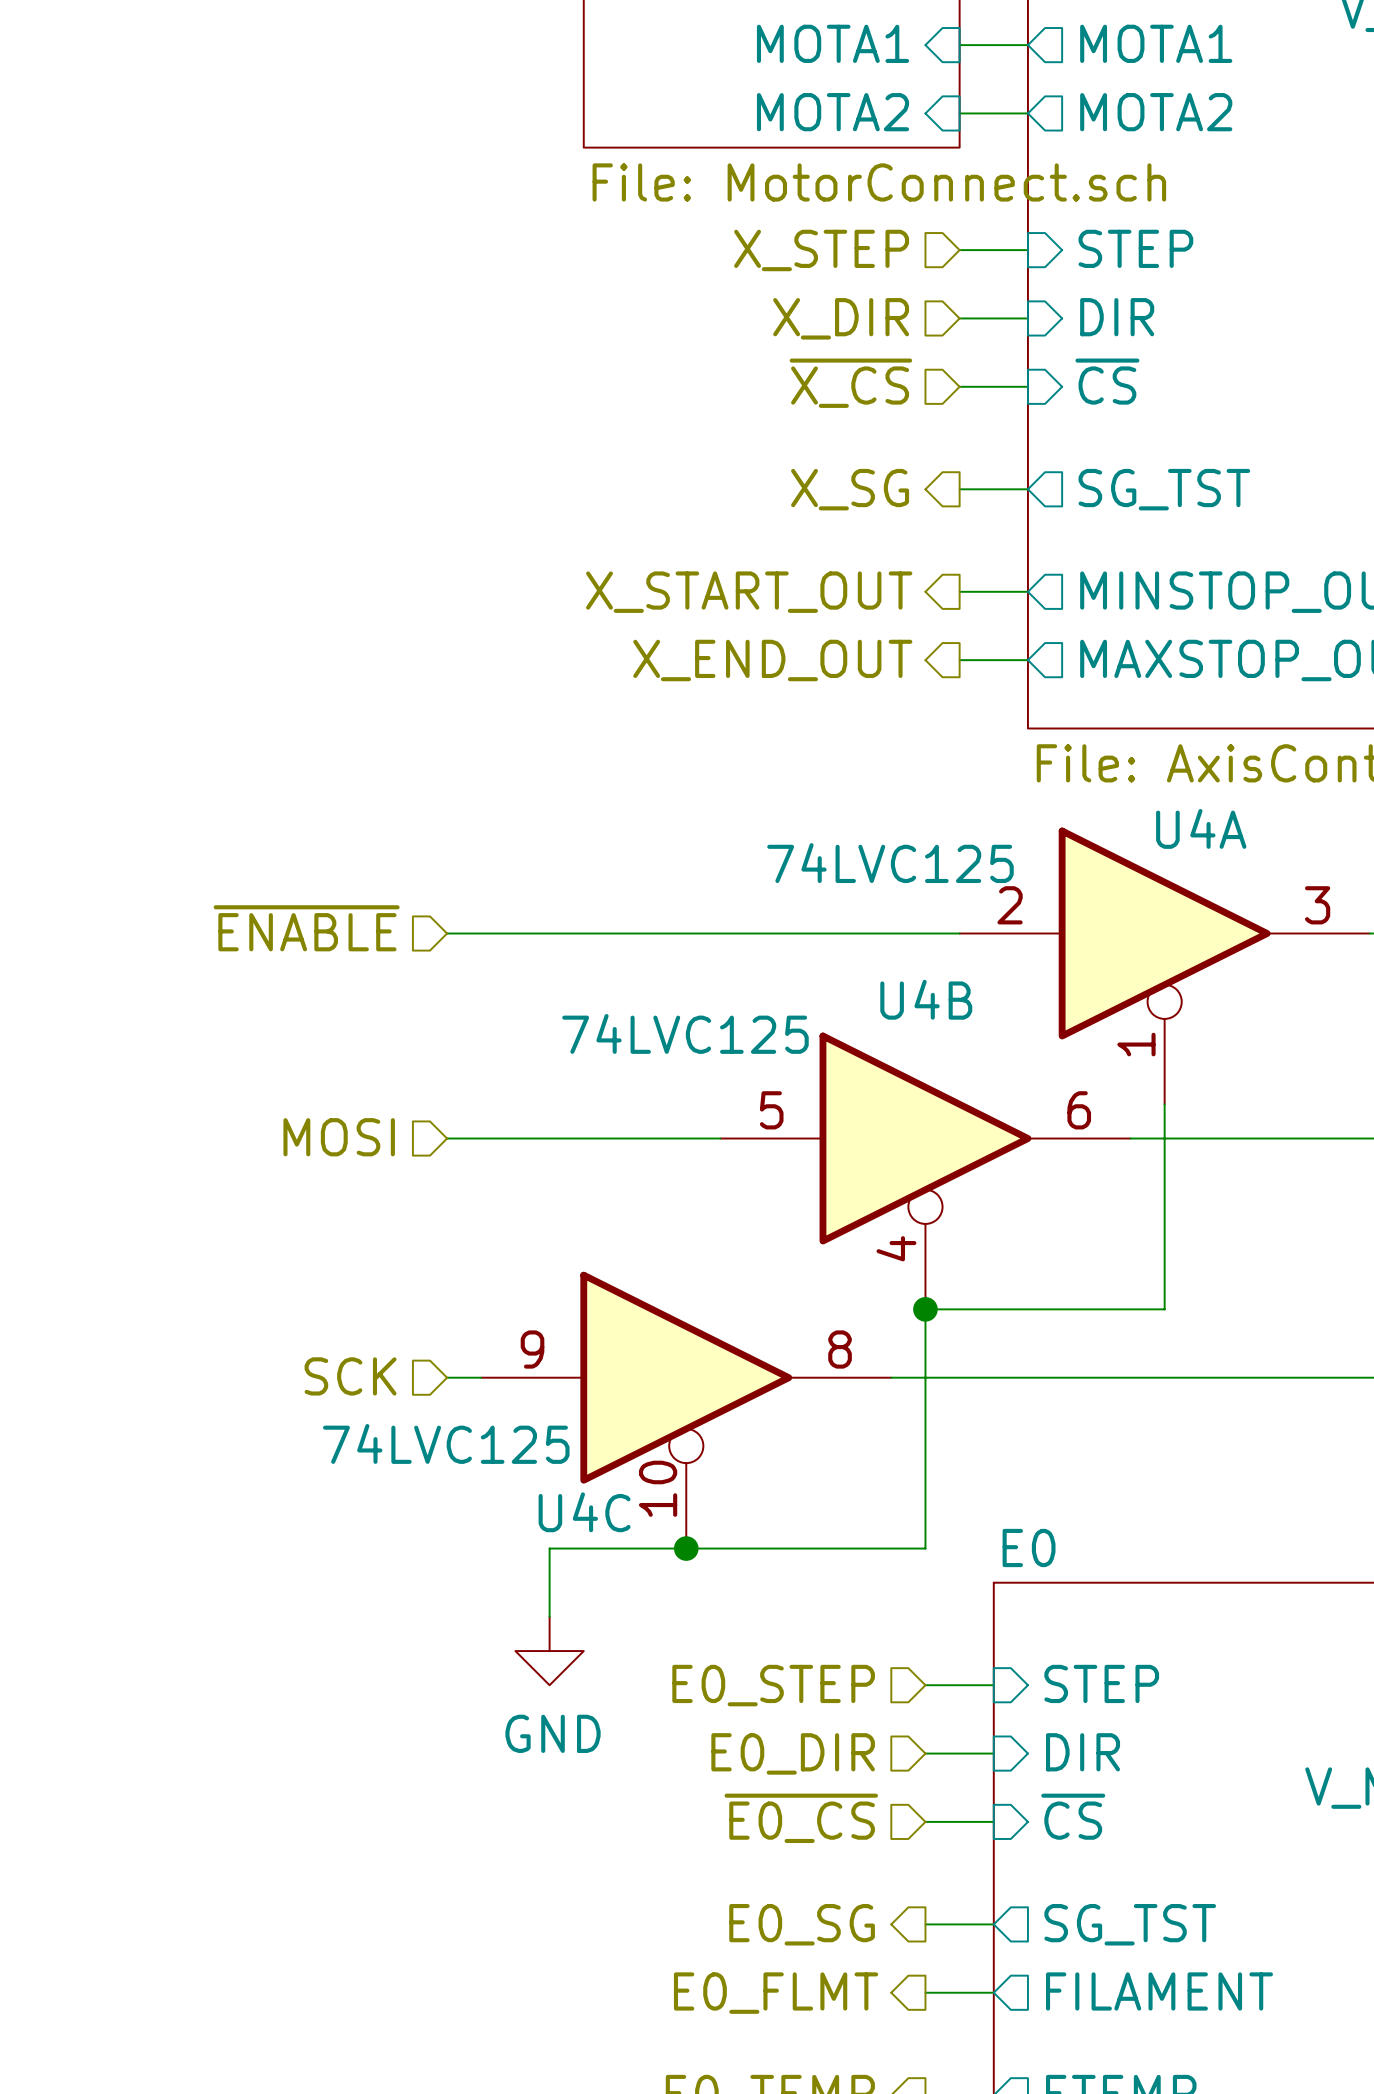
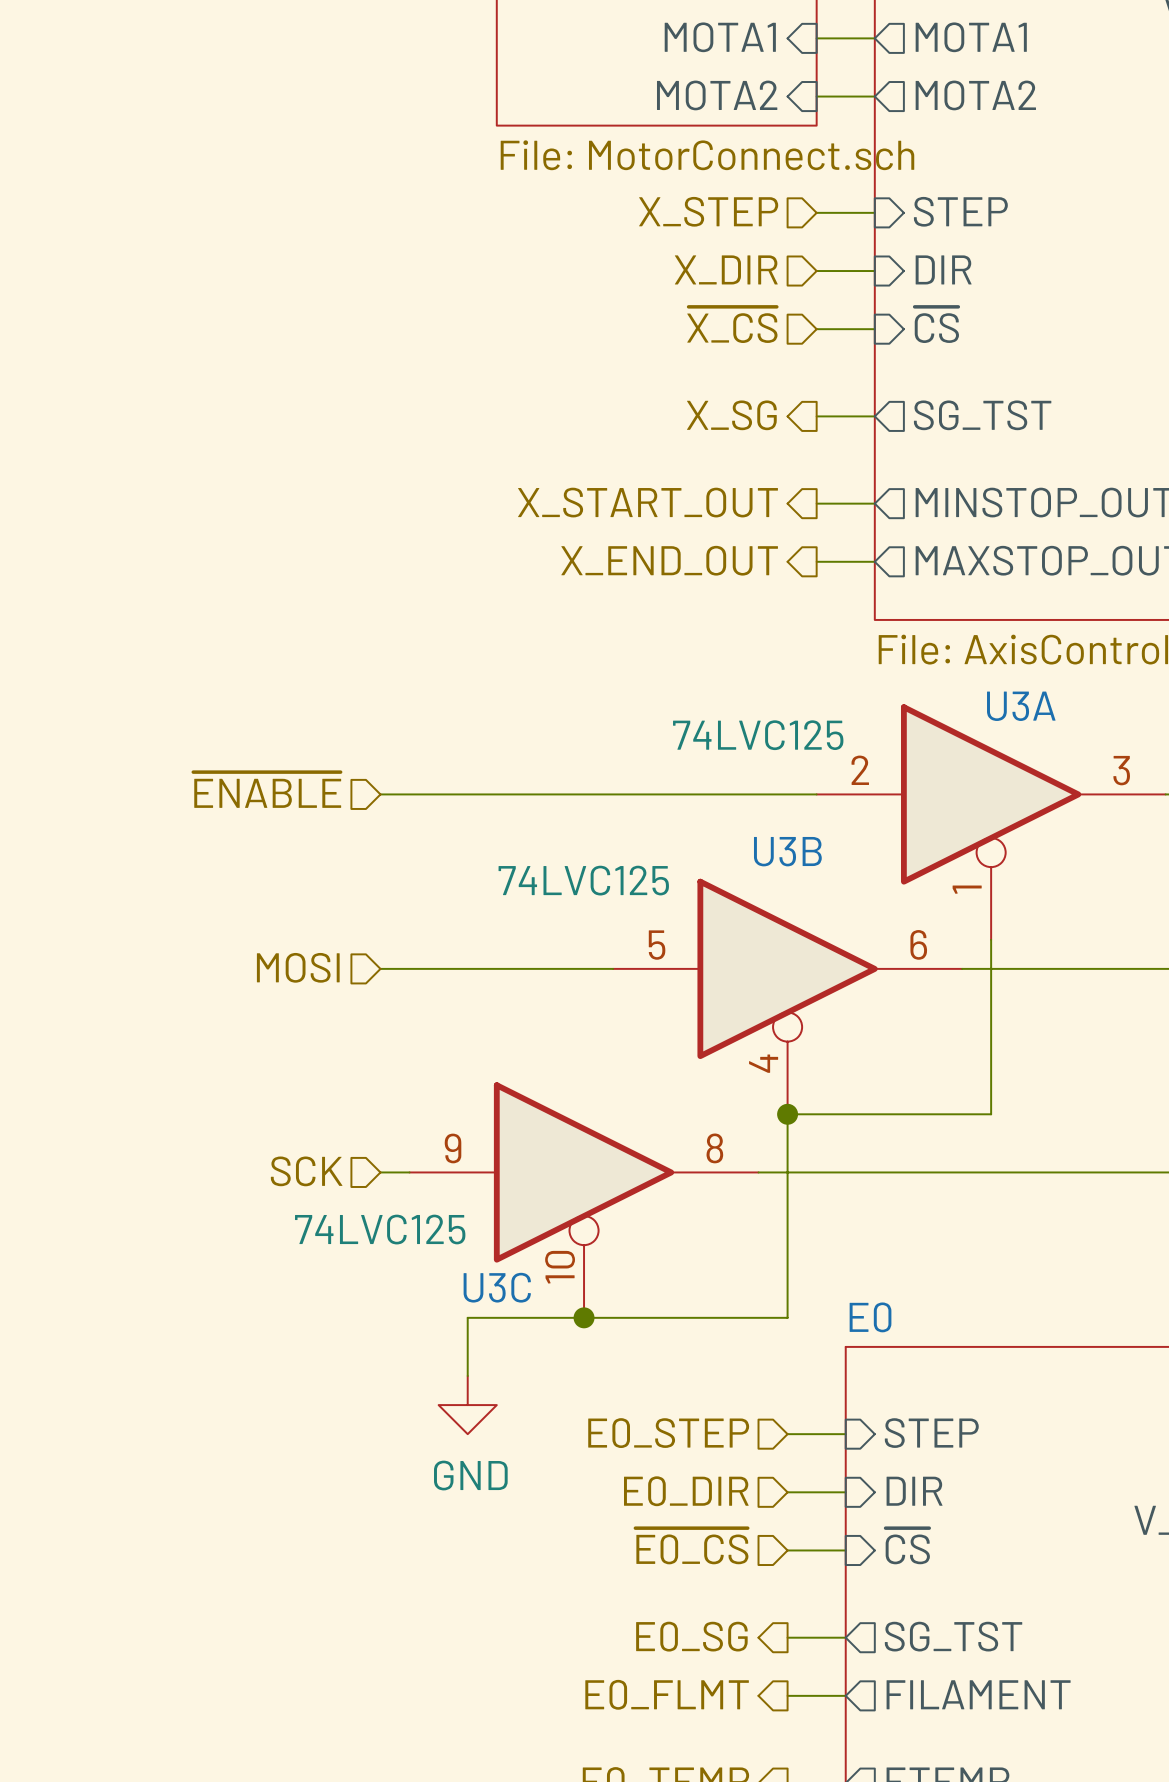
U4A name: U4A (1201, 828) -> U3A (1021, 706)
U4B name: U4B (926, 999) -> U3B (787, 851)
U4C name: U4C (584, 1512) -> U3C (497, 1287)

